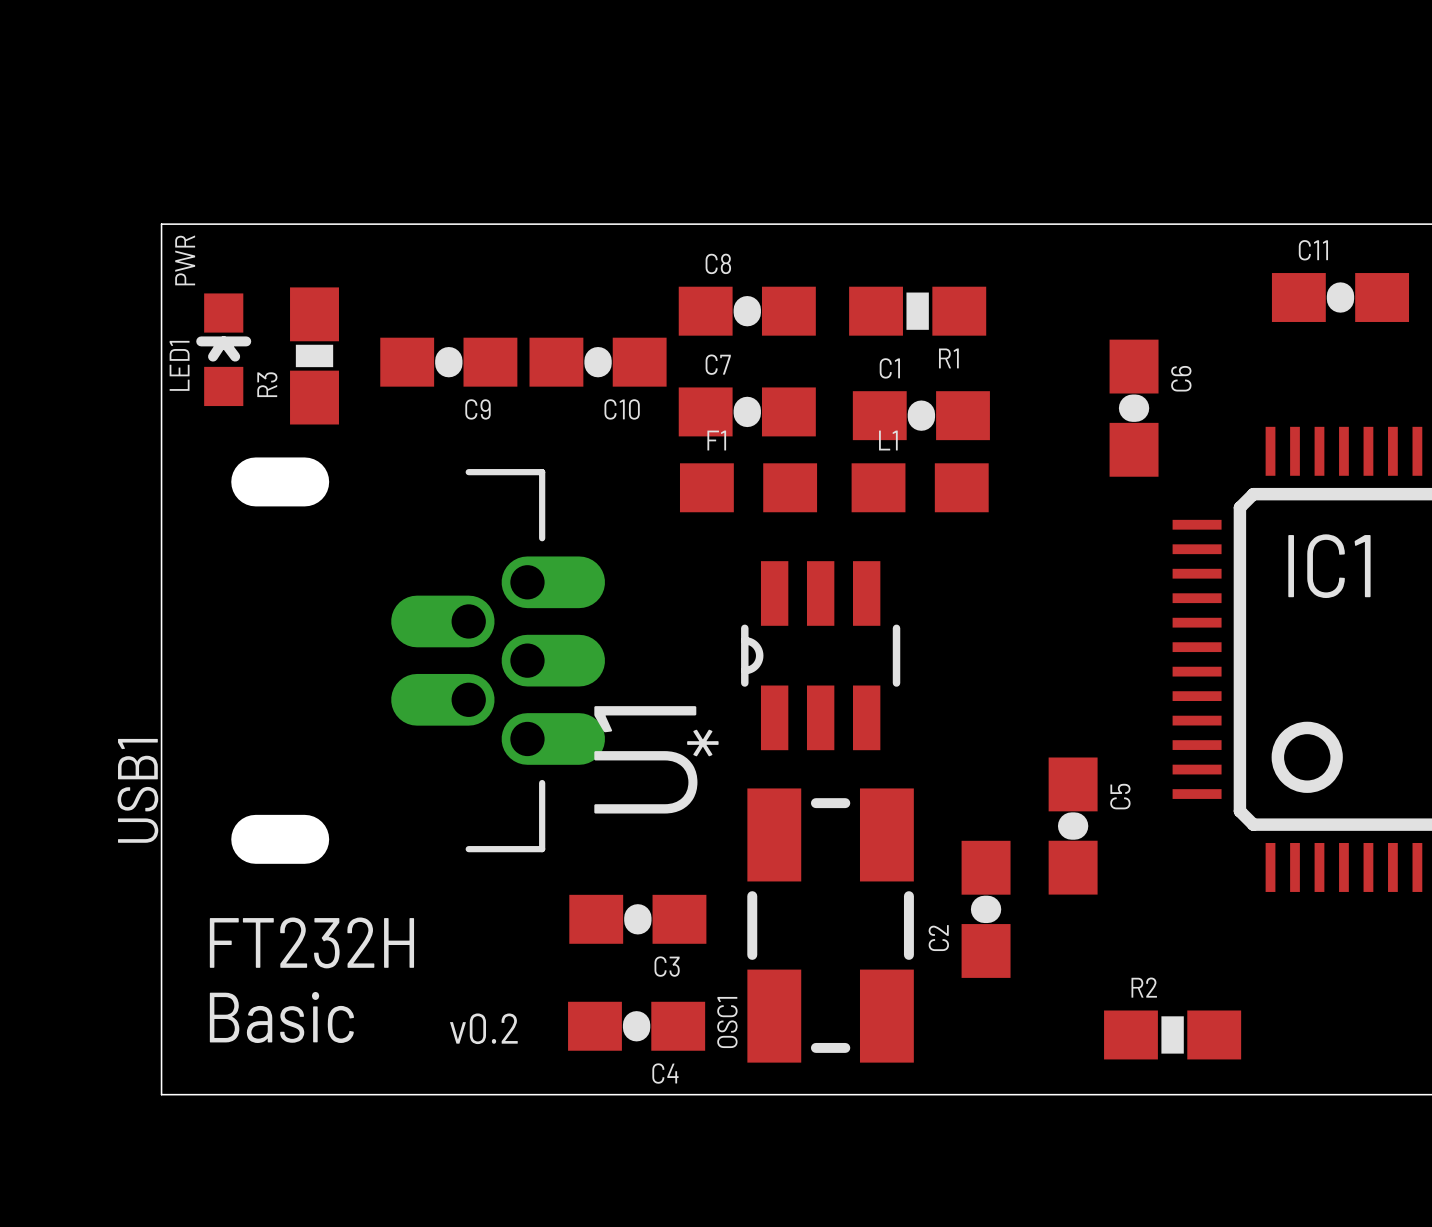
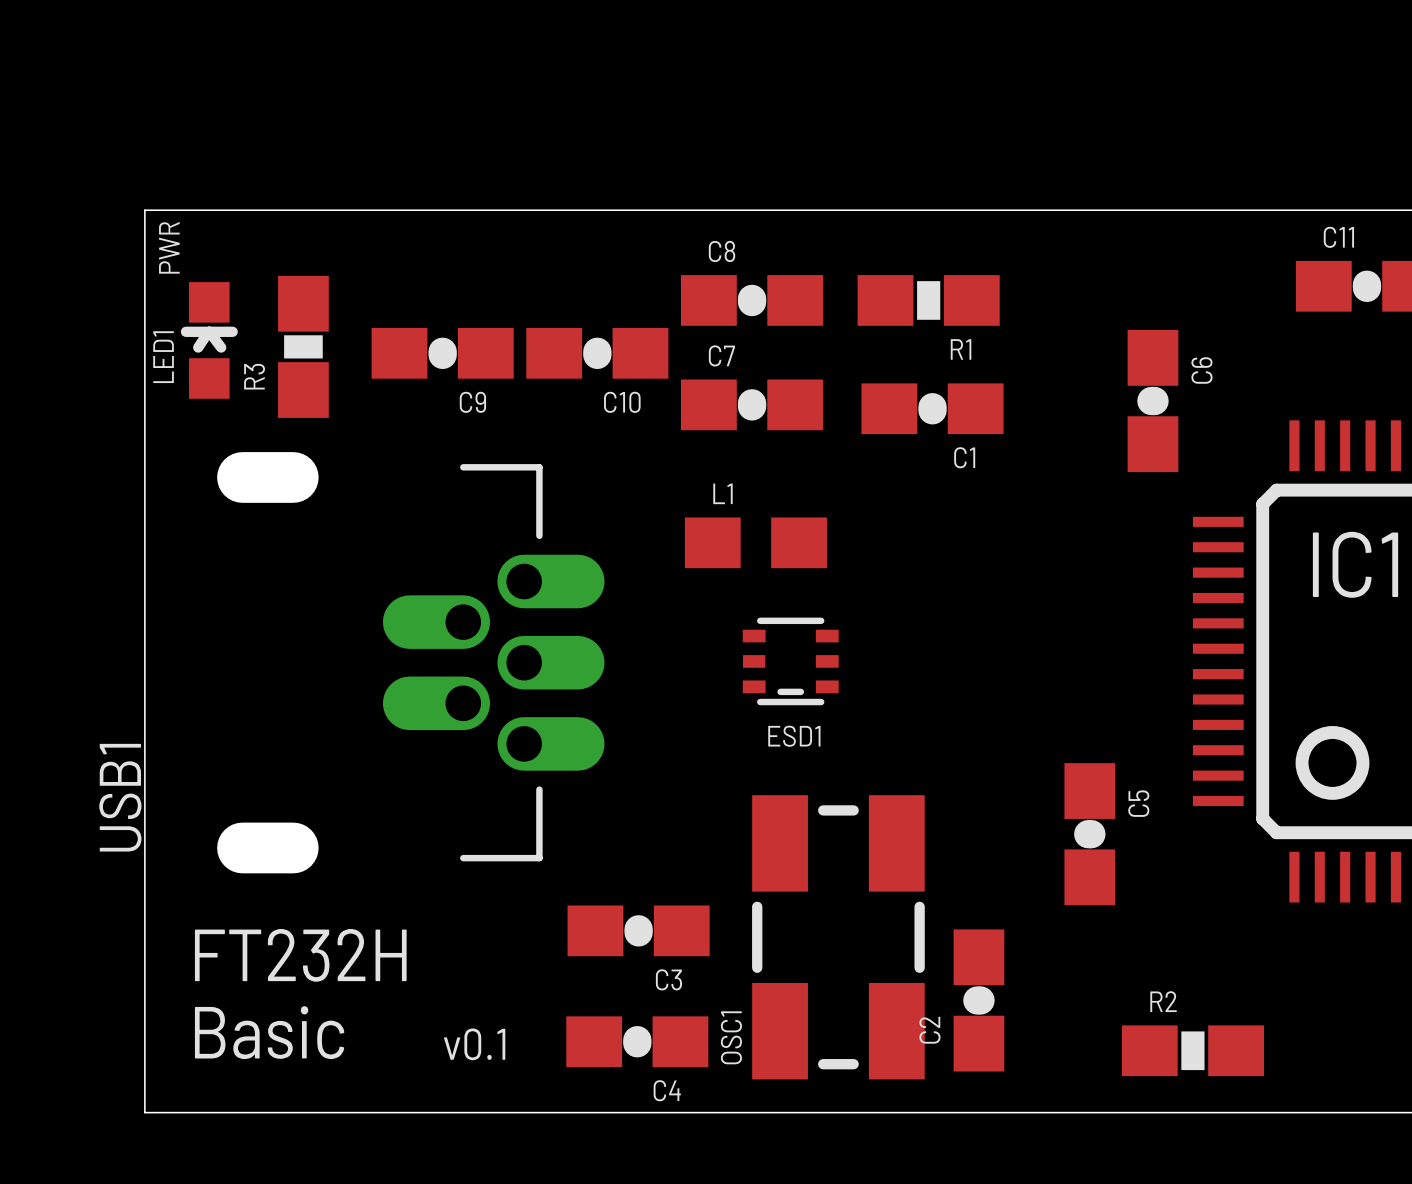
C1 name position: C1 (889, 368) -> C1 (964, 457)
F1: (748, 487) -> none
L1 position: (920, 487) -> (755, 542)
U1: (820, 655) -> none
ESD1: none -> (790, 661)
C2 position: (986, 909) -> (978, 1000)
text: v0.2 (483, 1028) -> v0.1 (474, 1044)

